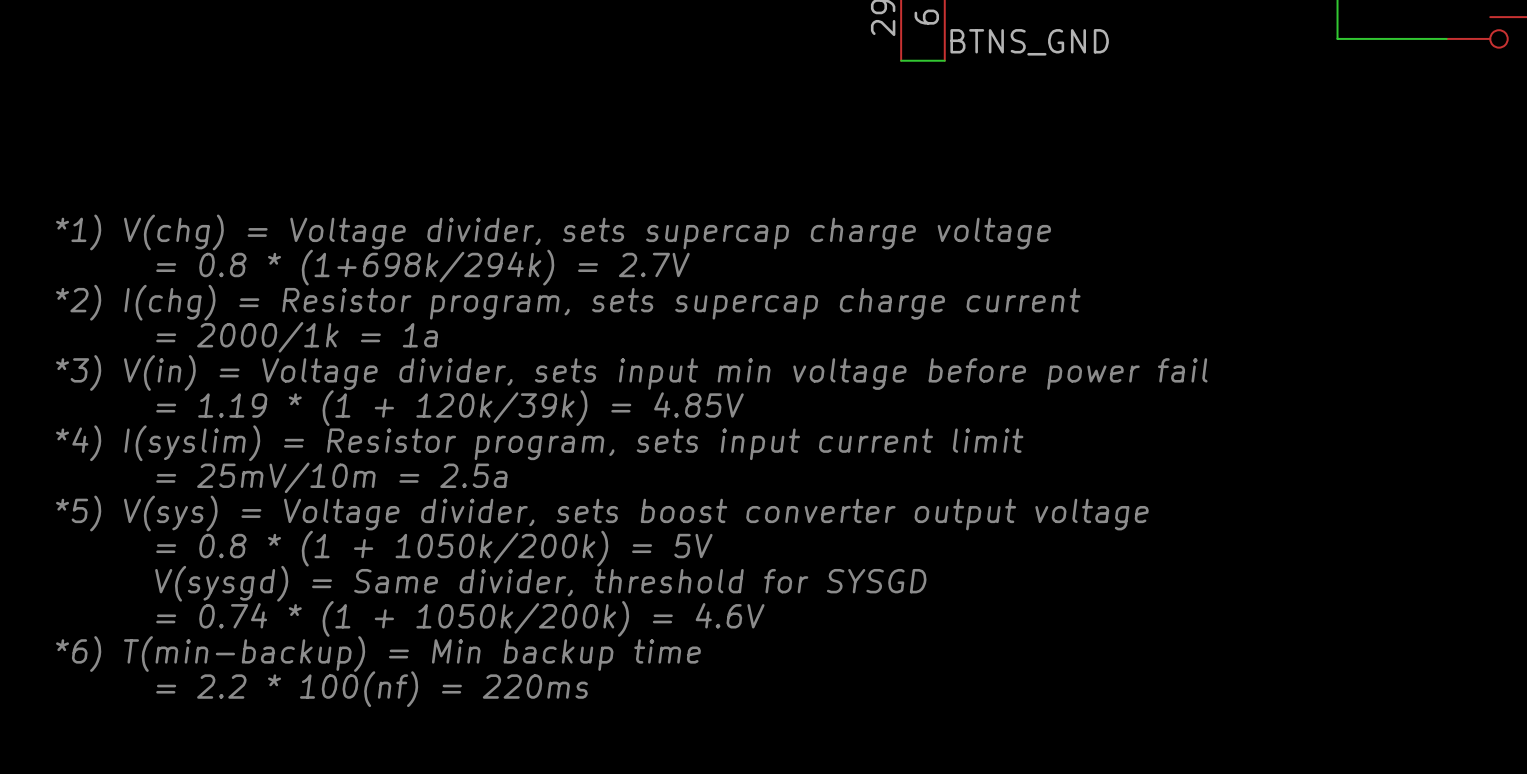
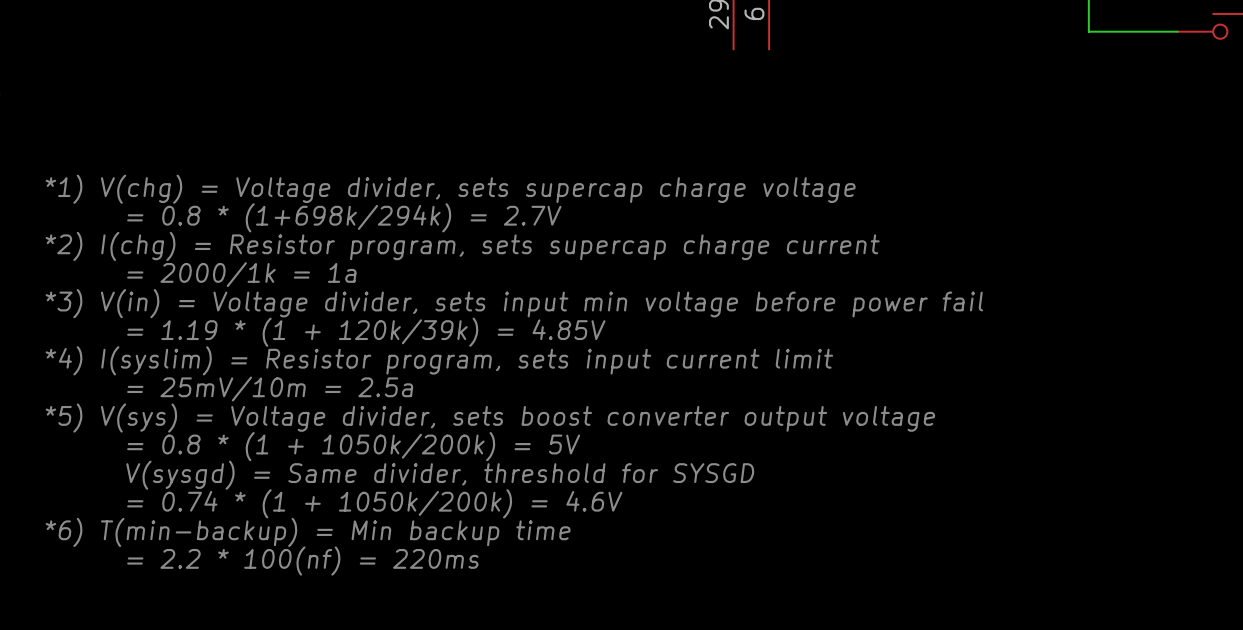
label: BTNS_GND (1029, 42) -> none
wire: (901, 60) (944, 60) -> none

